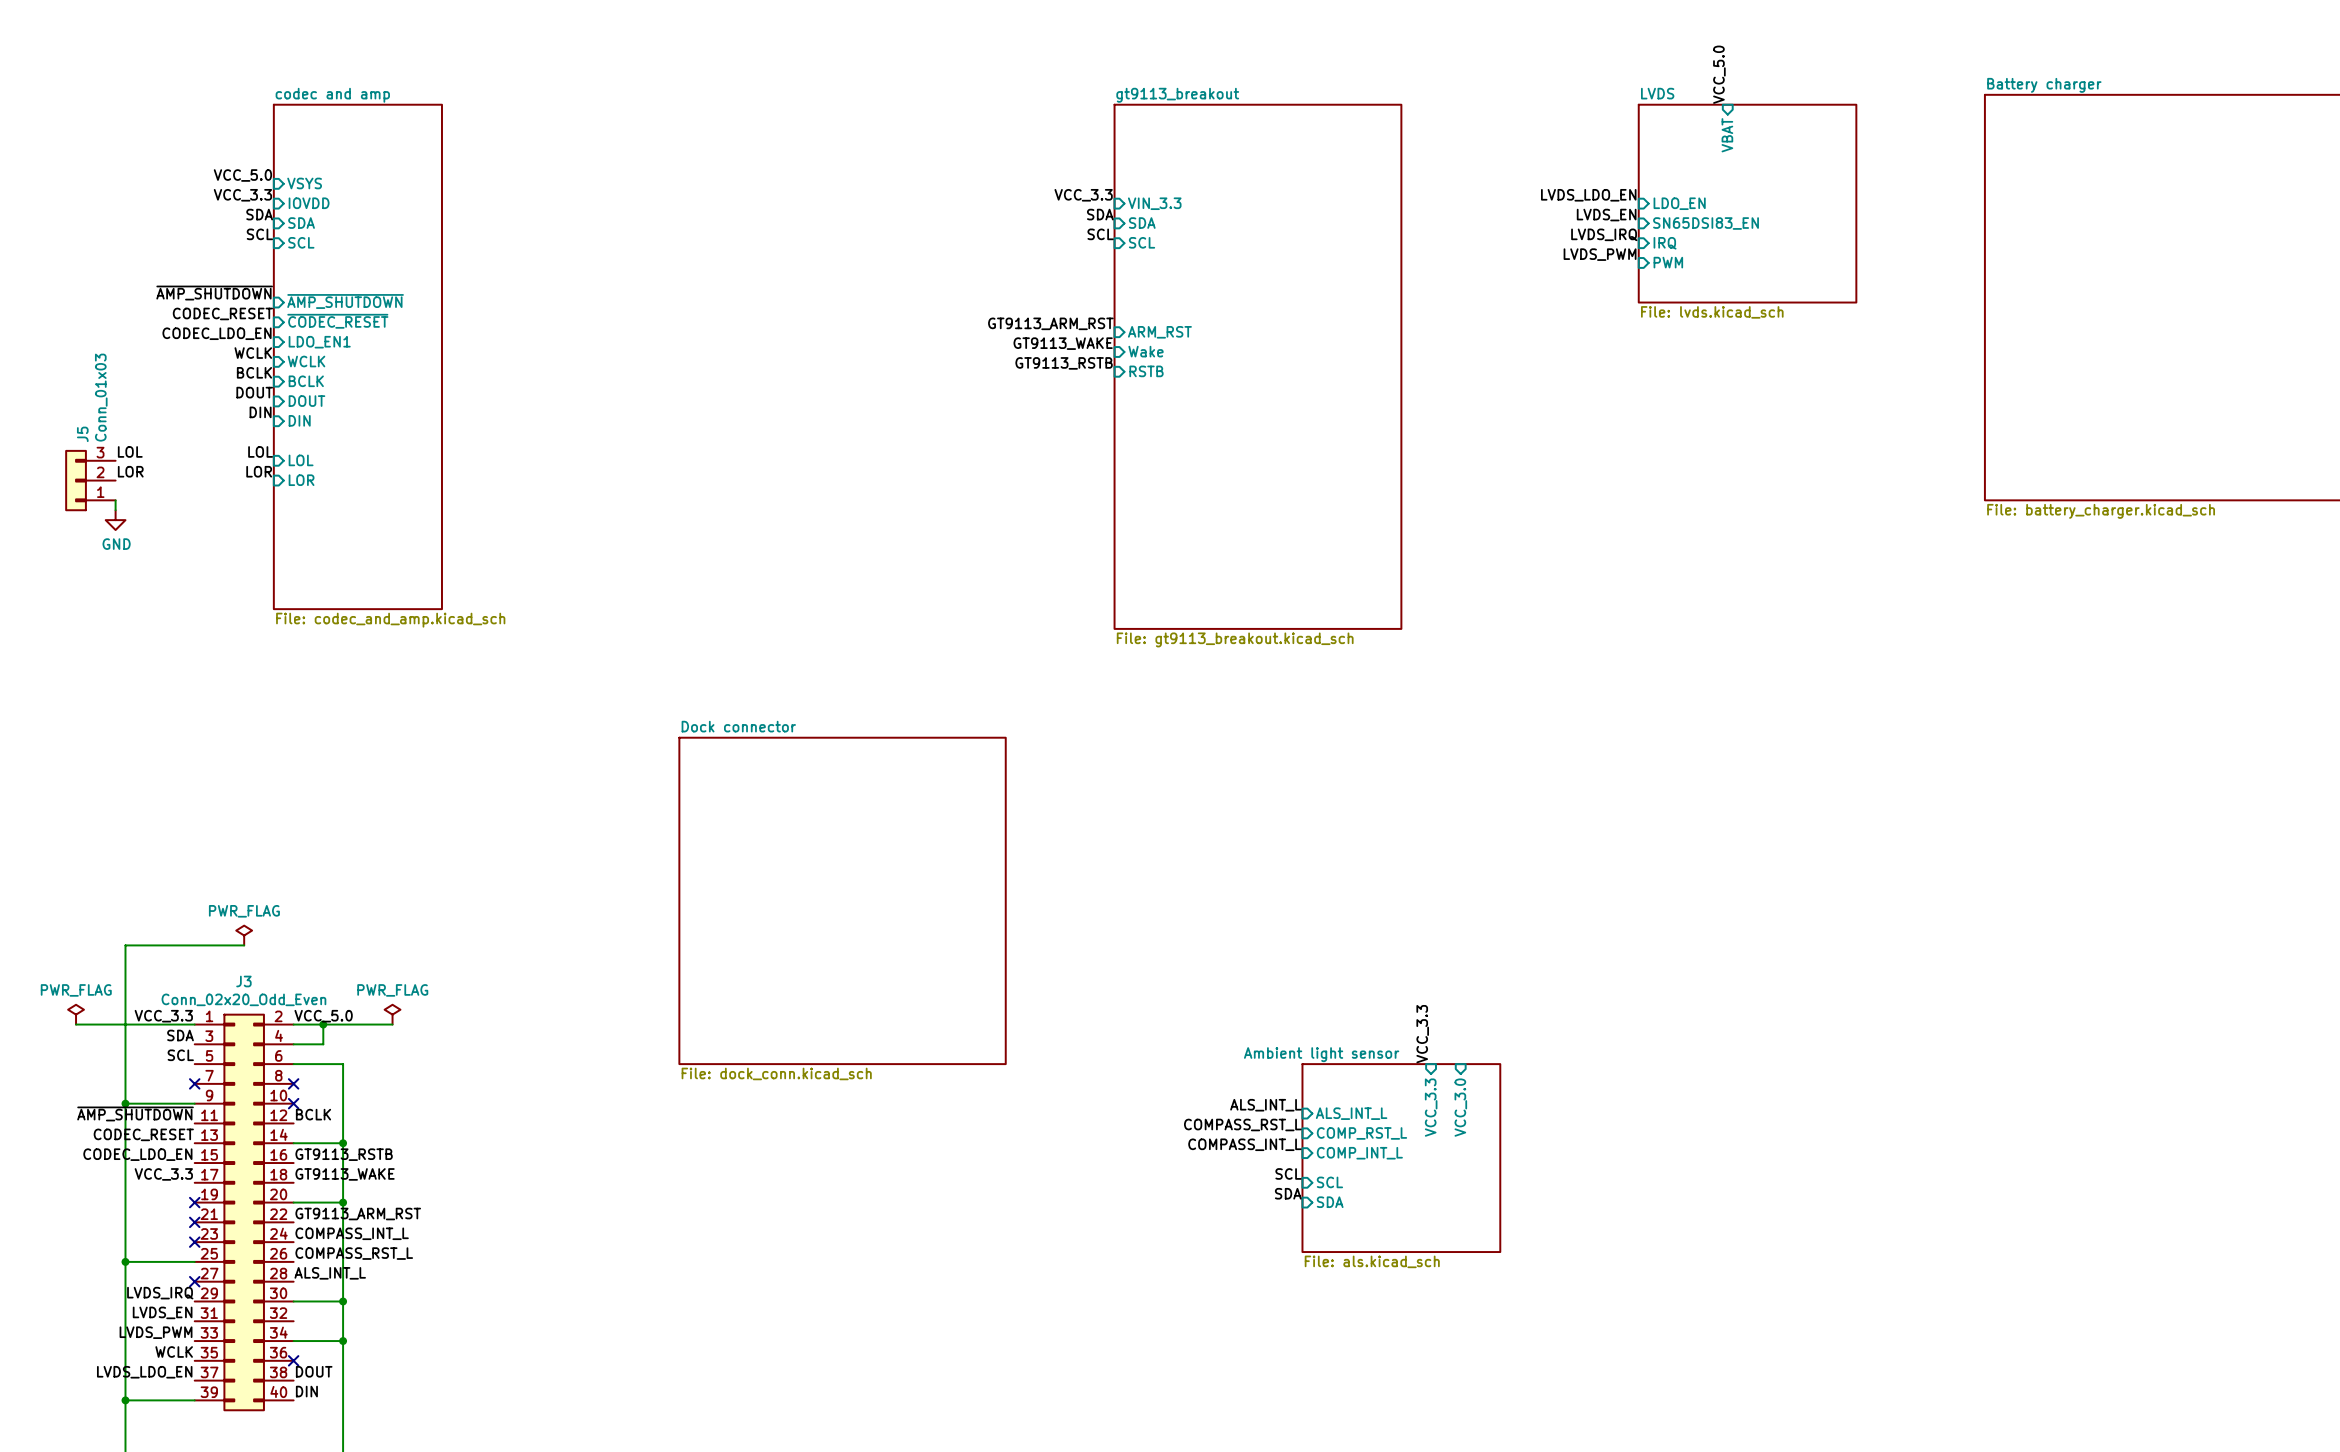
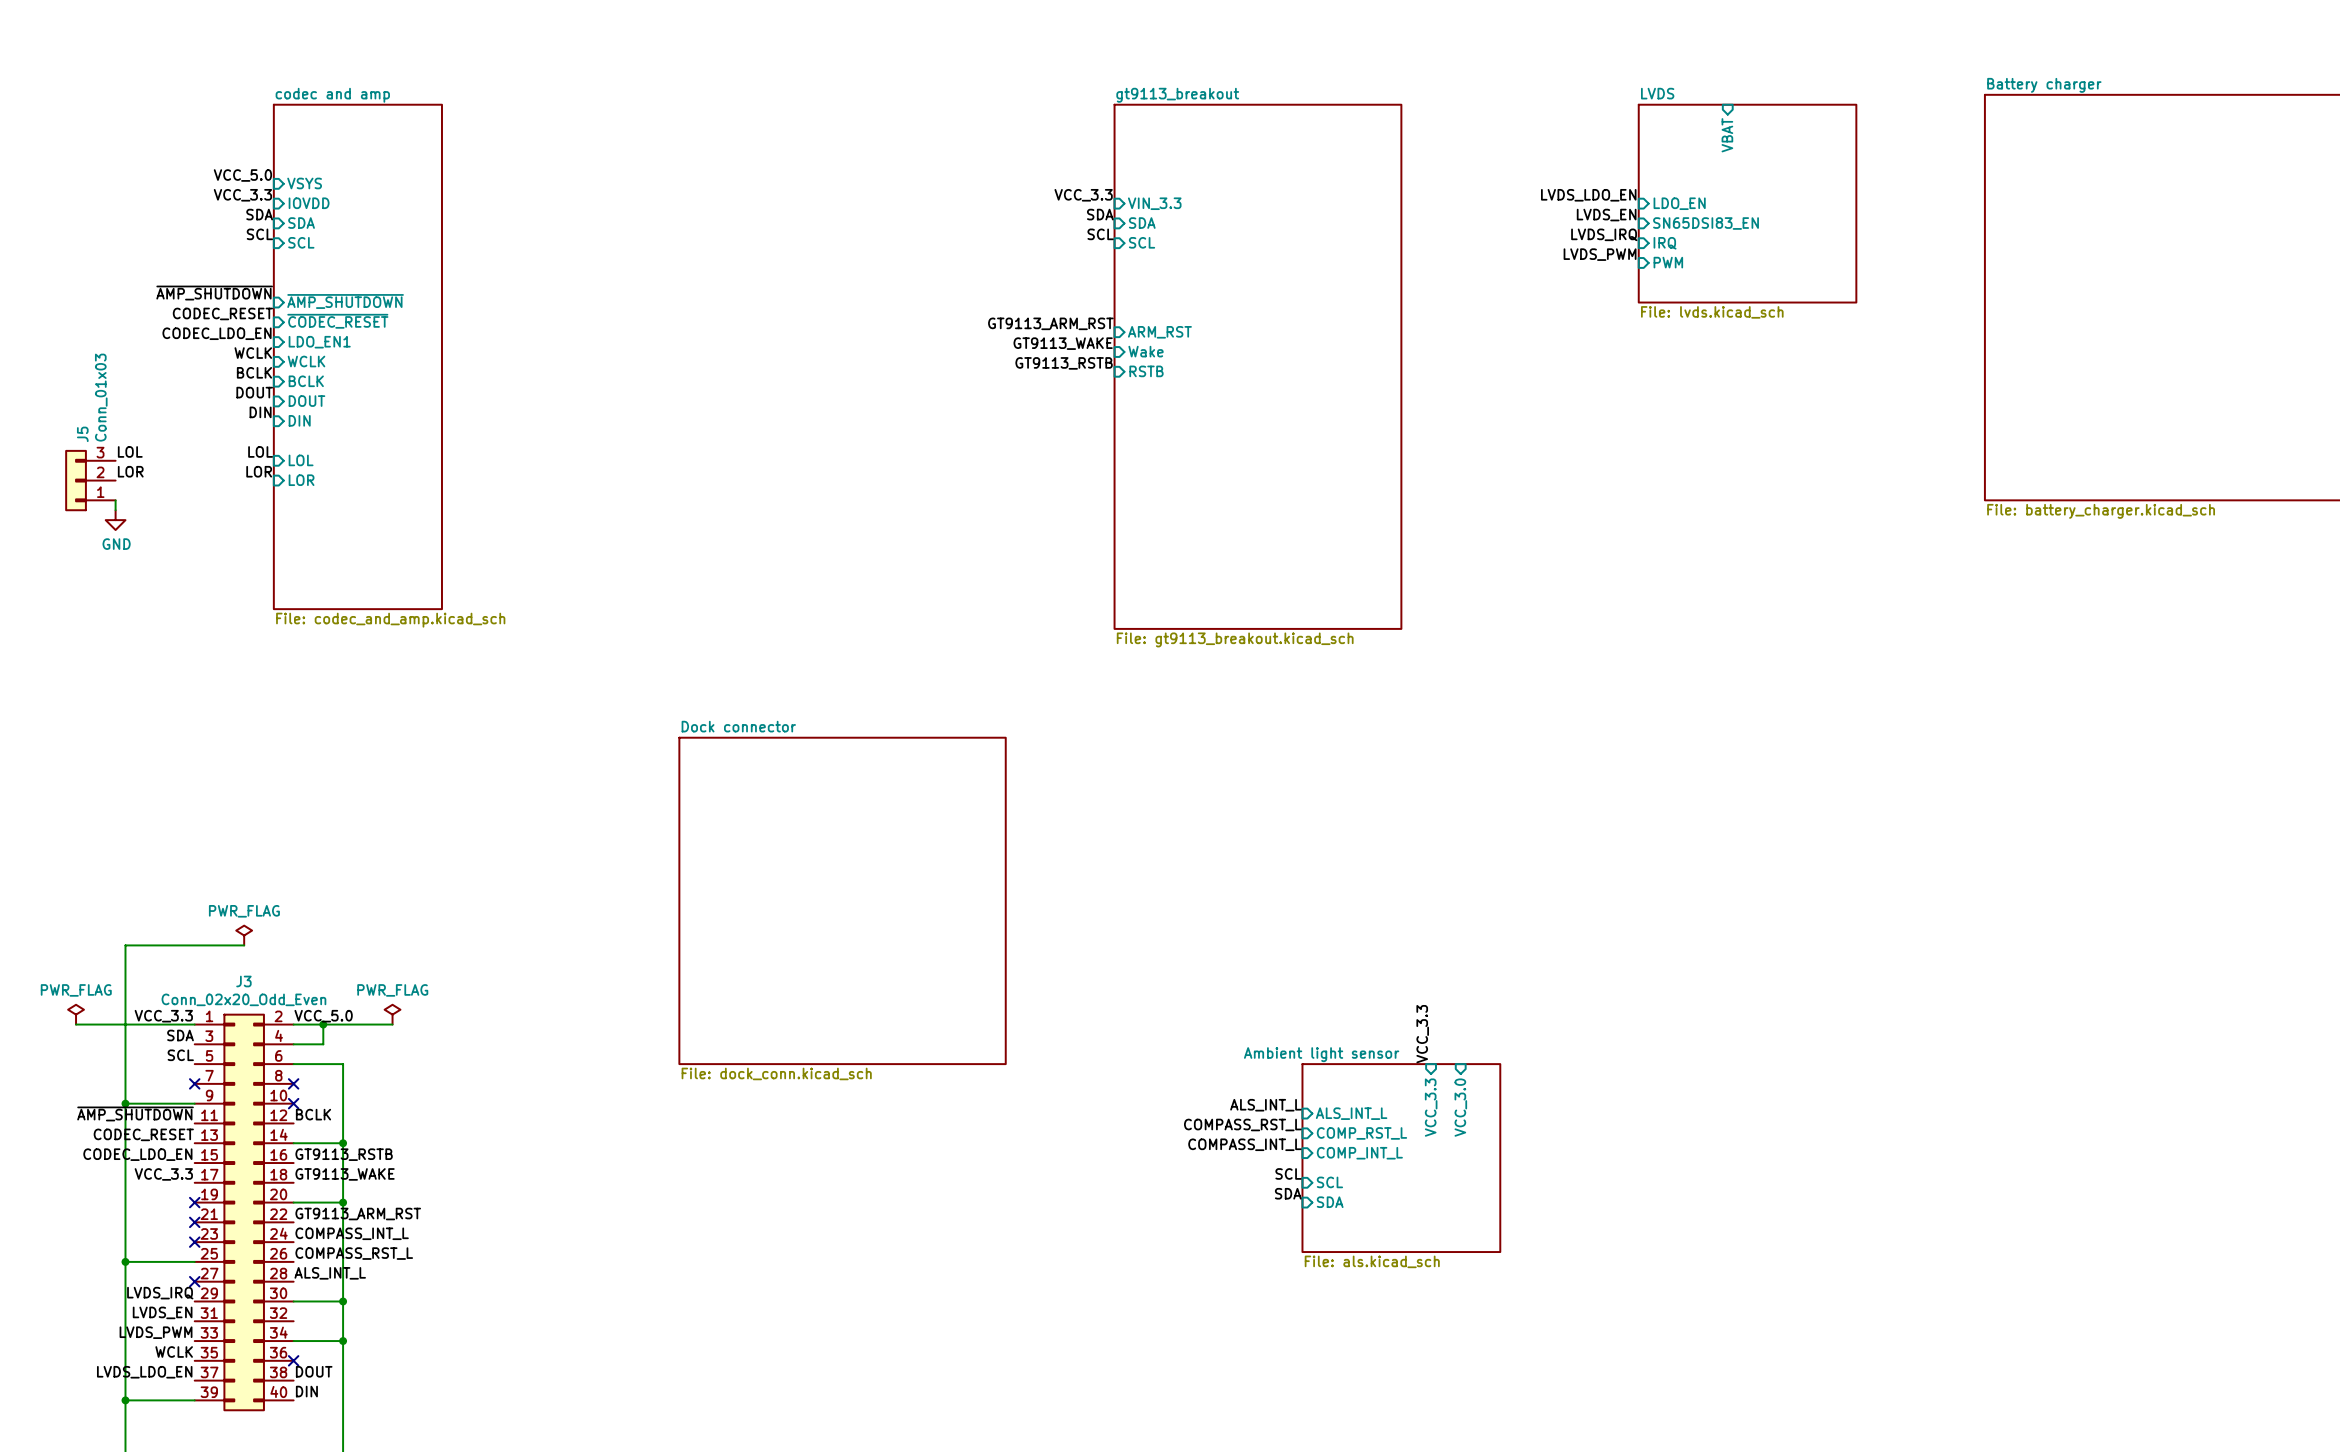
label: VCC_5.0 (1719, 74) -> none

